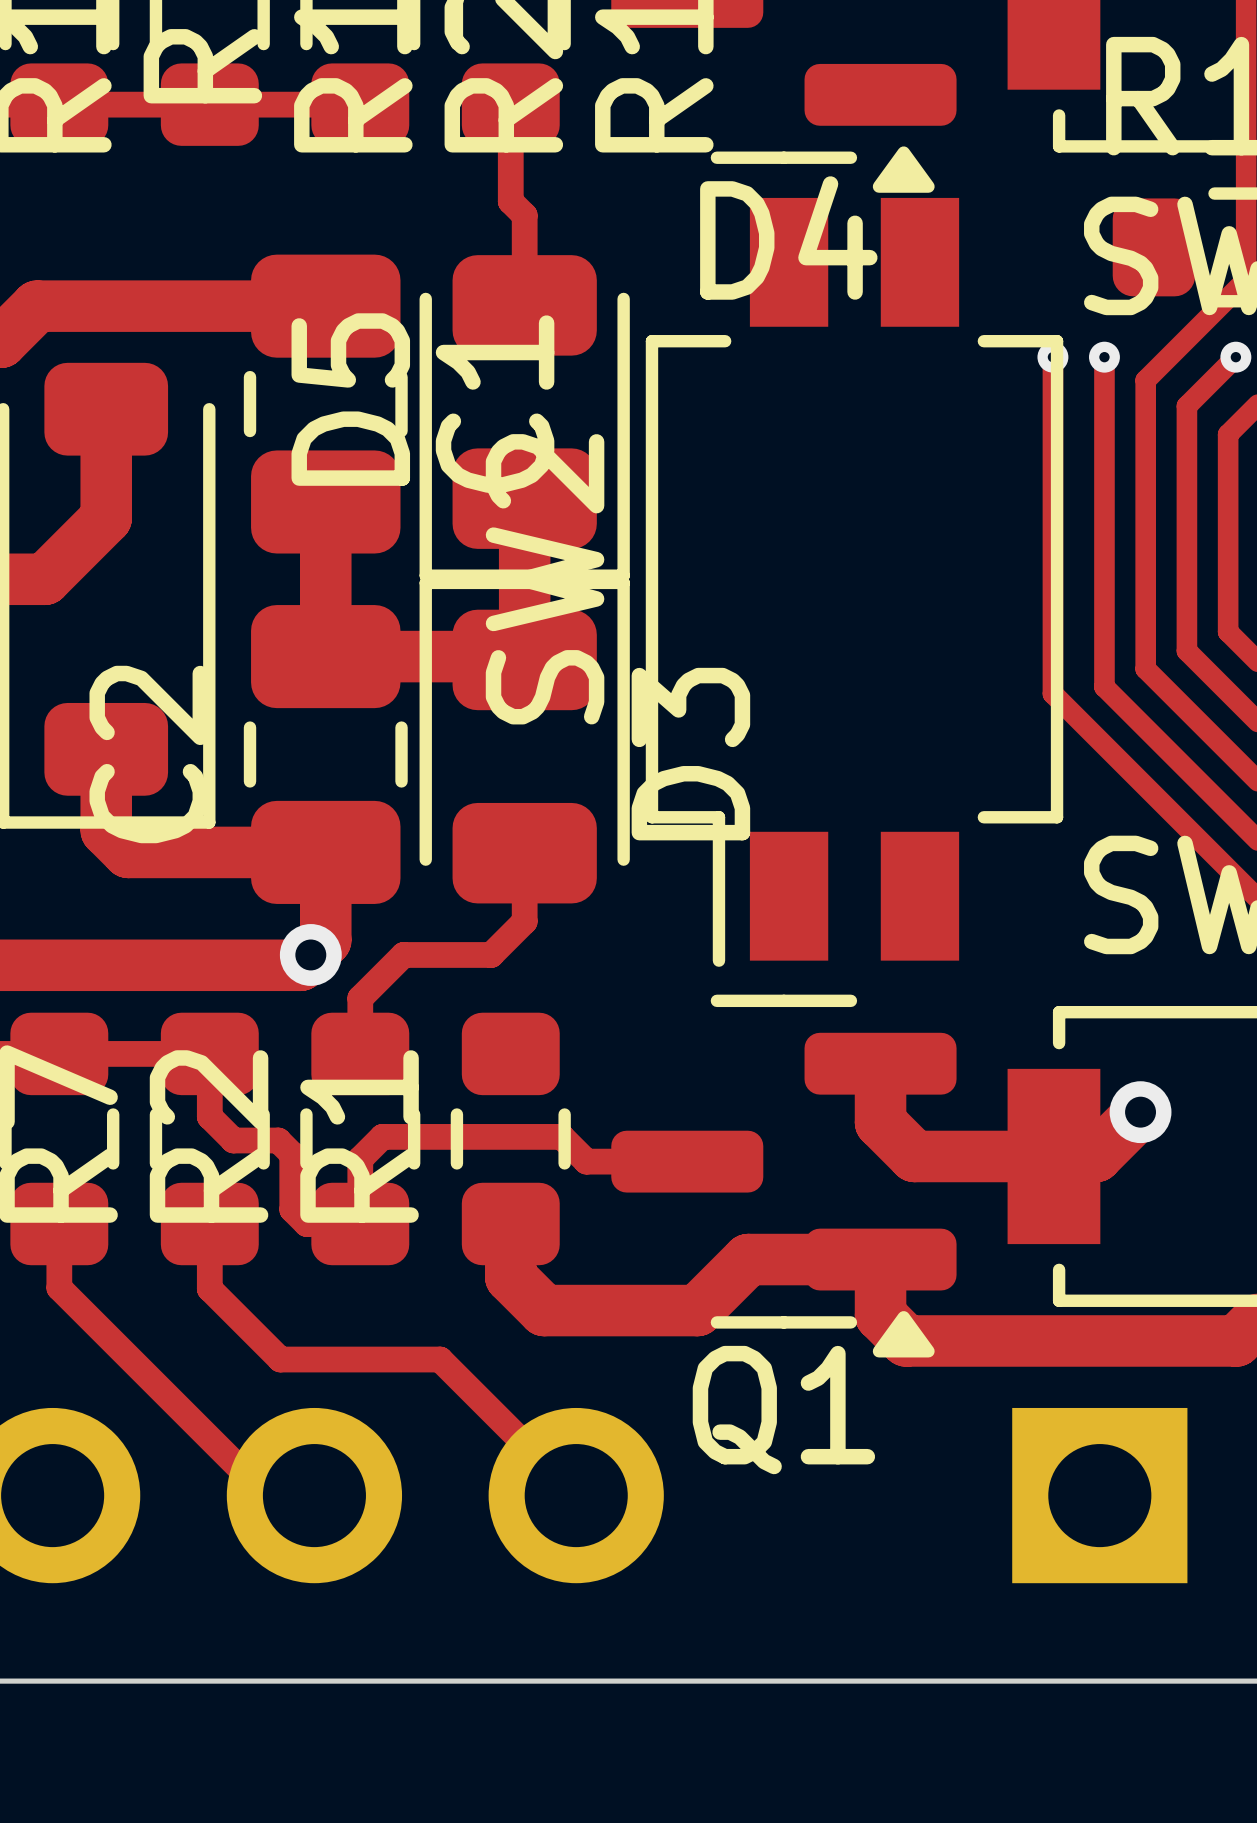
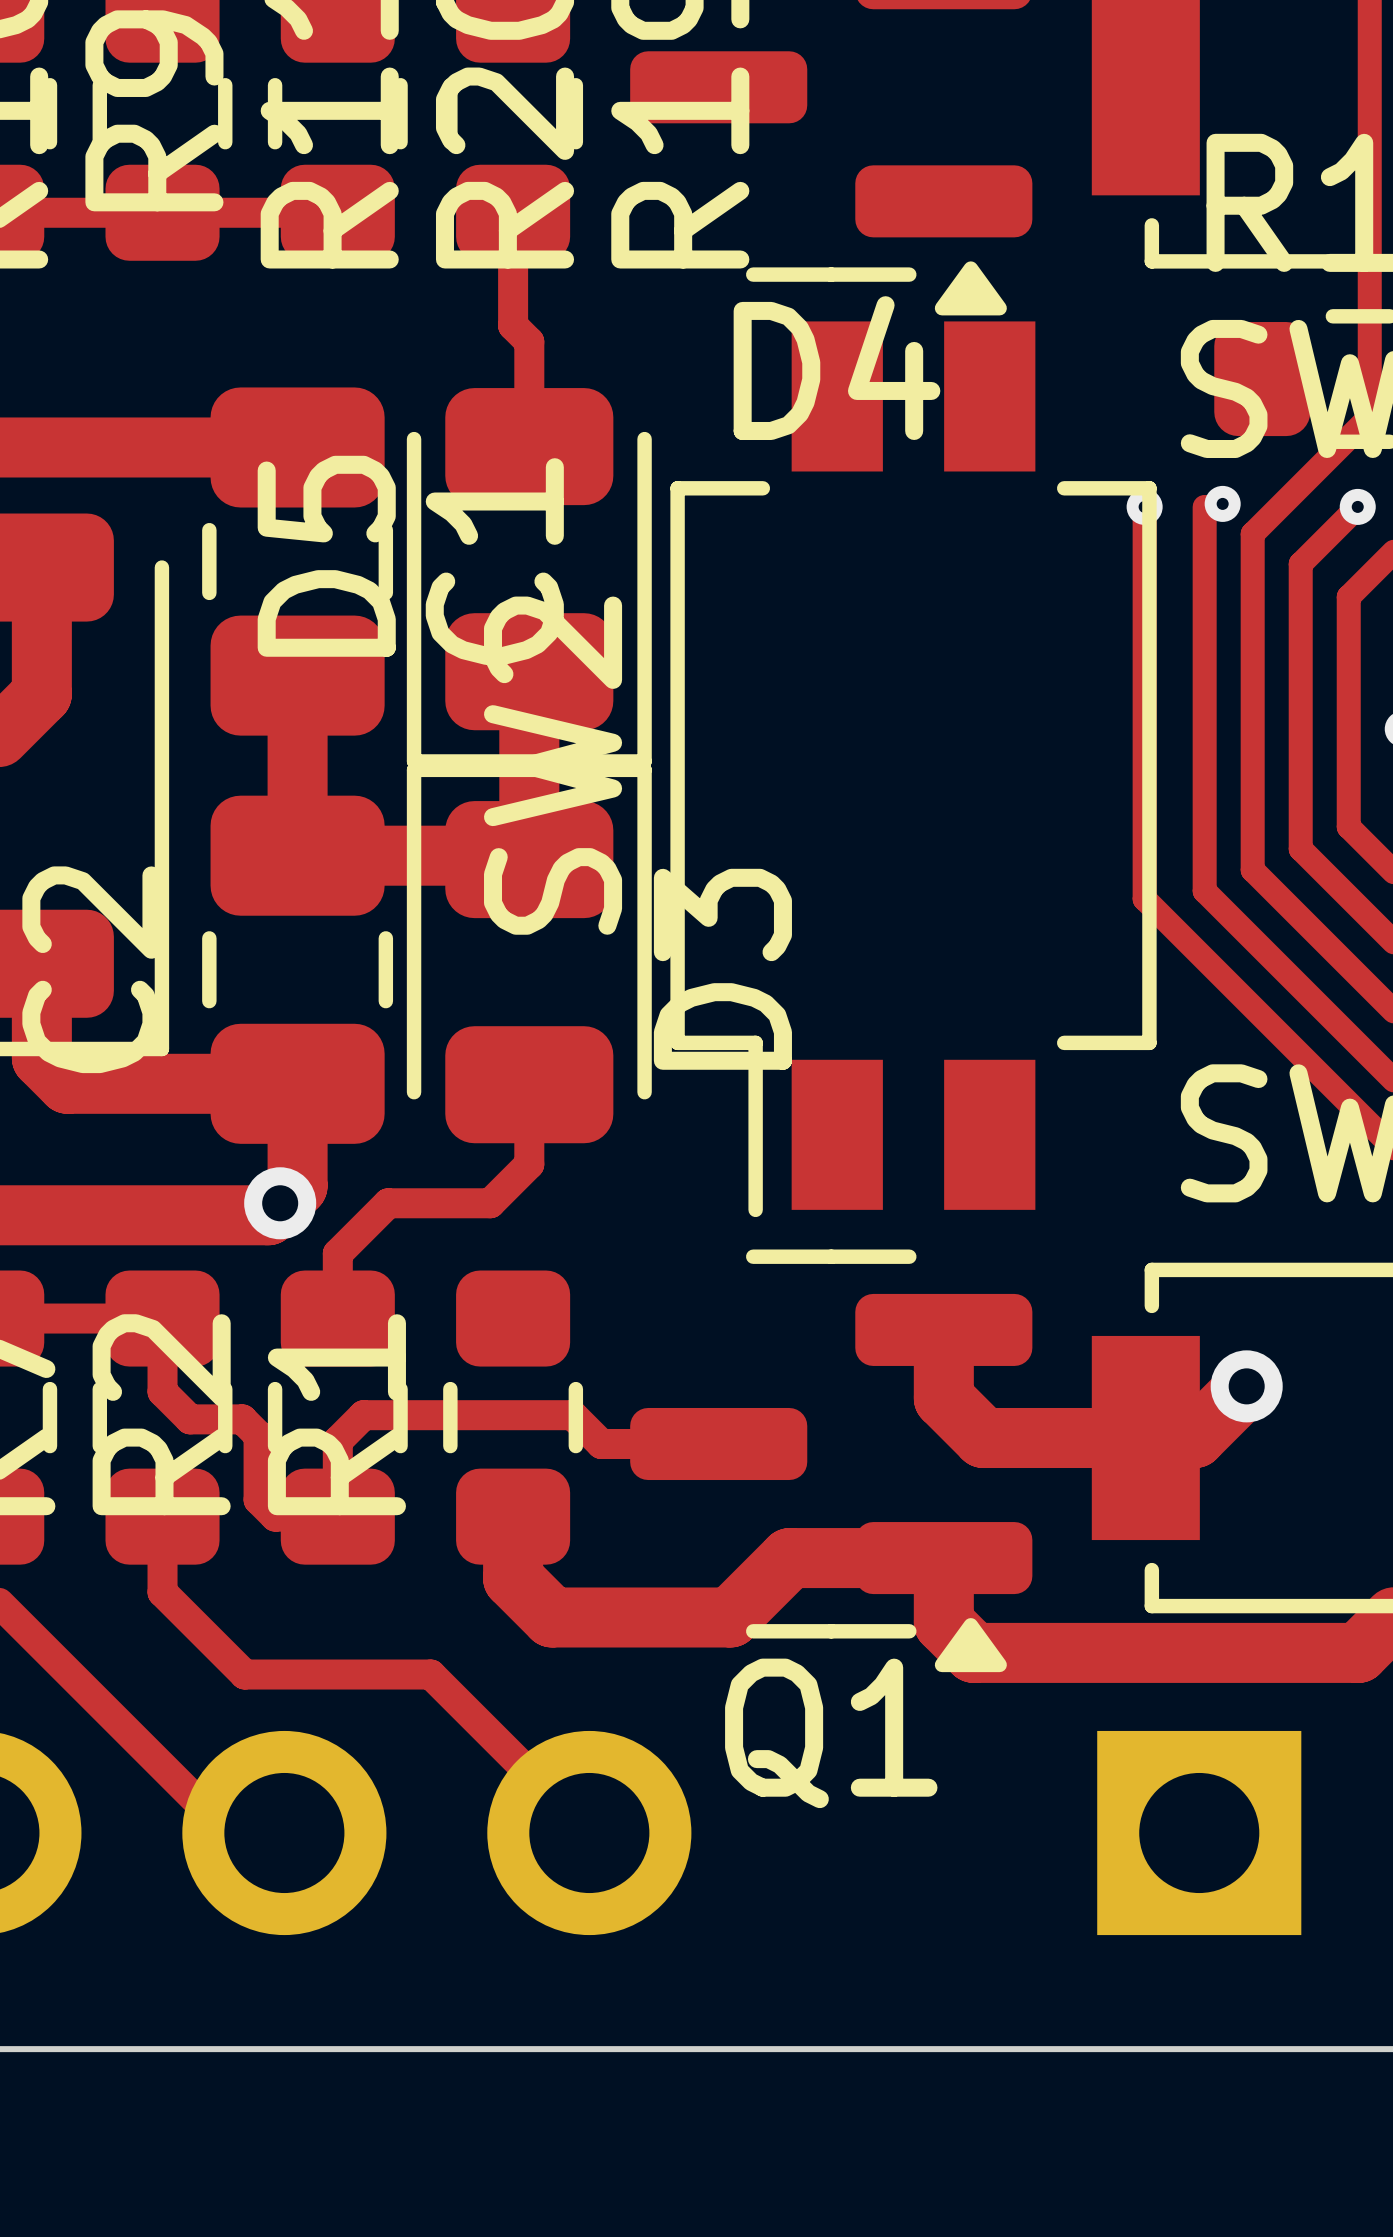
via position: (1104, 357) -> (1222, 503)

